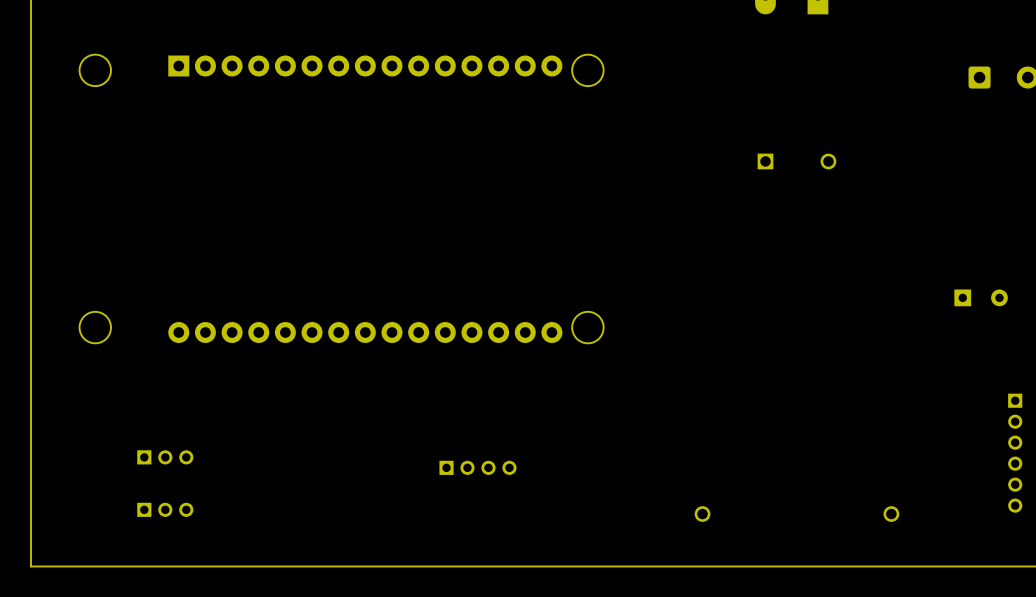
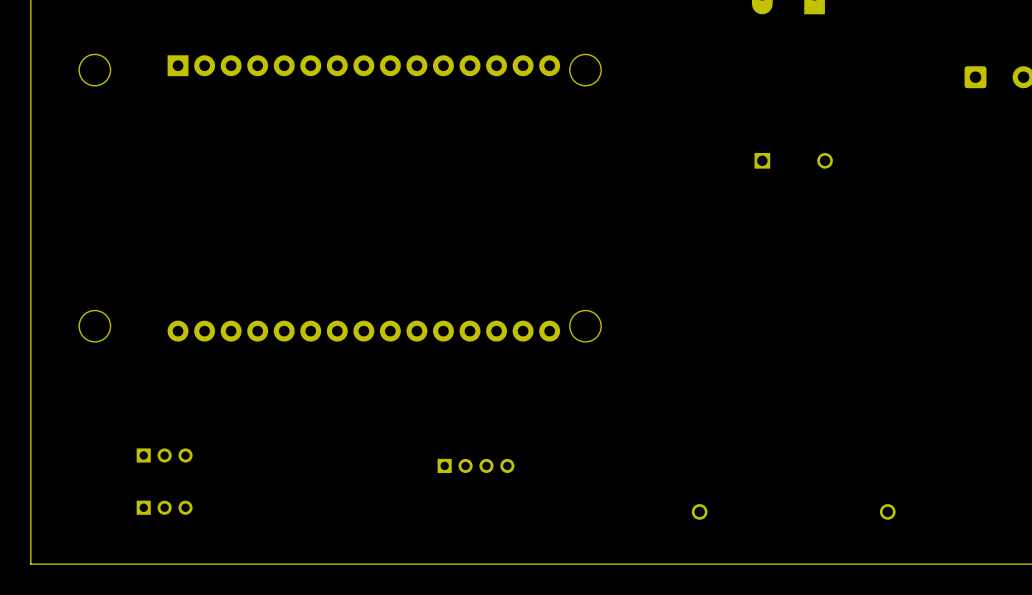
part: (981, 297) -> none
part: (1015, 453) -> none

